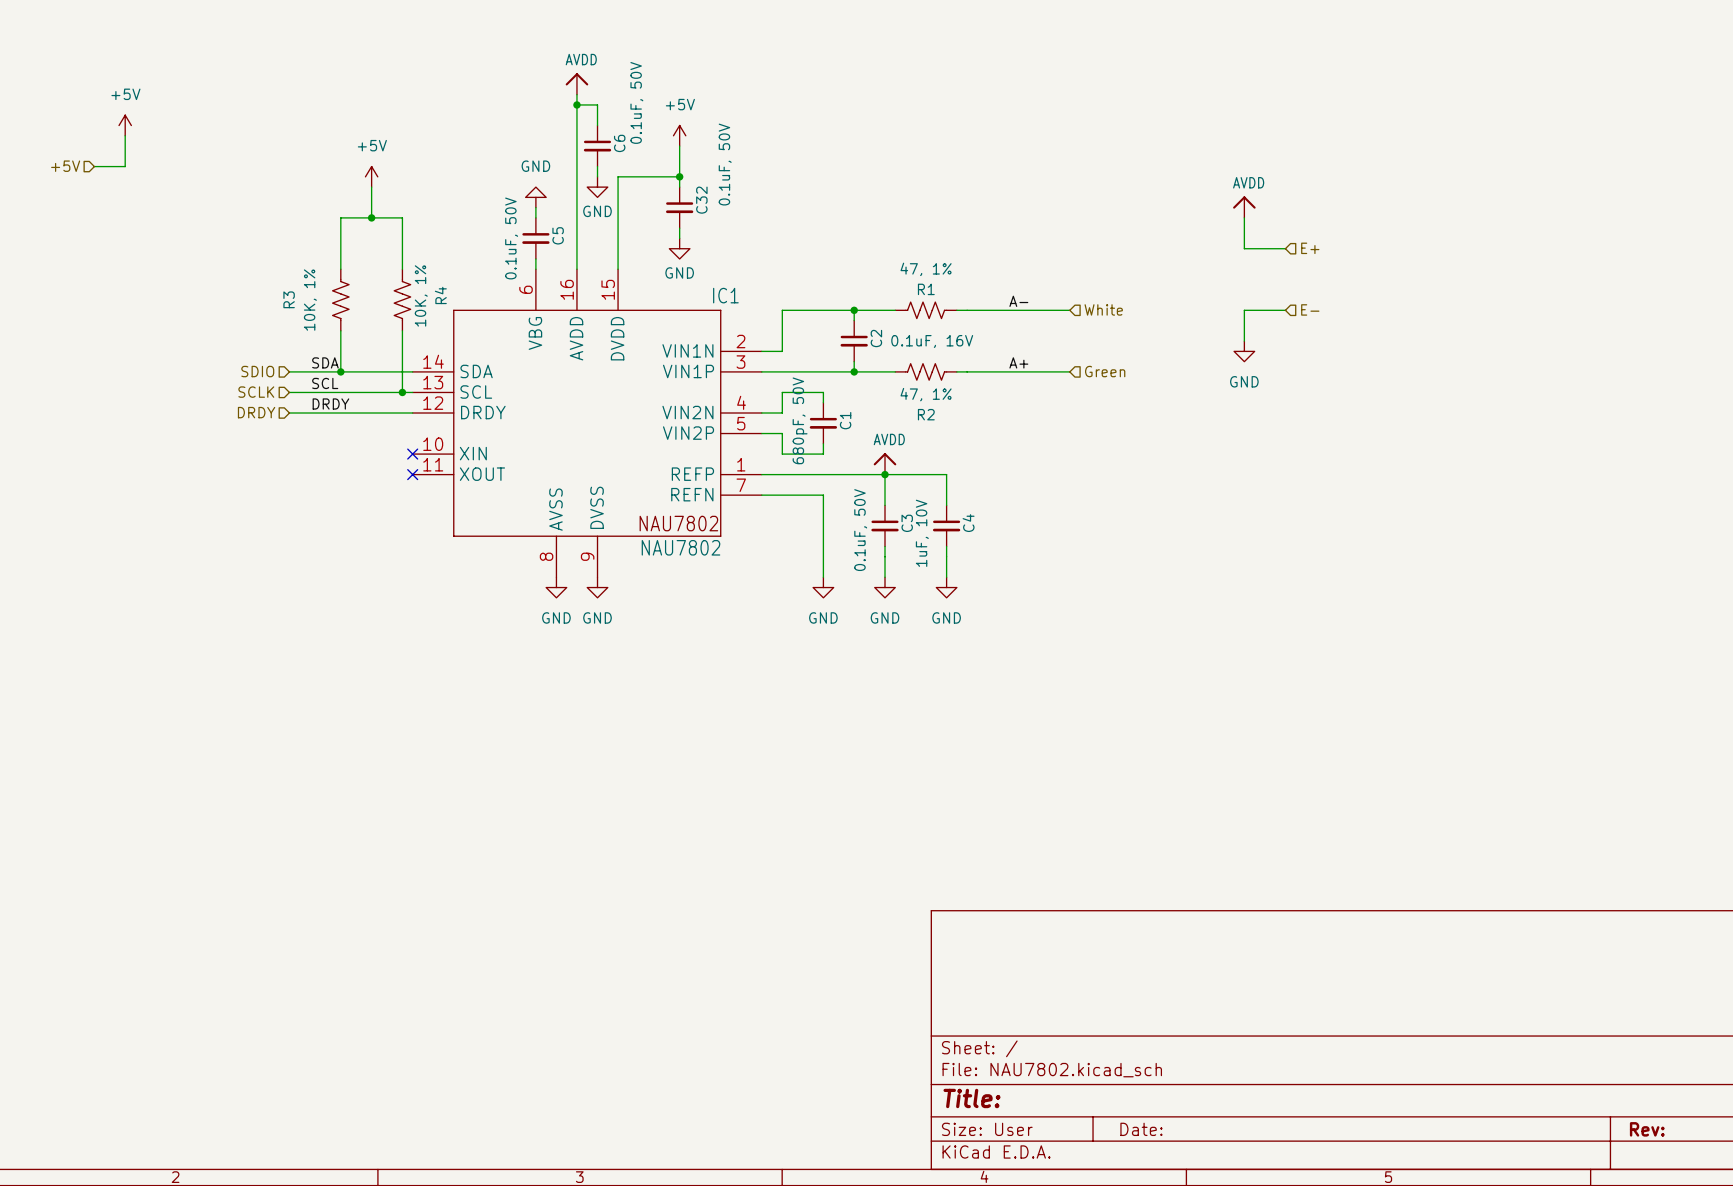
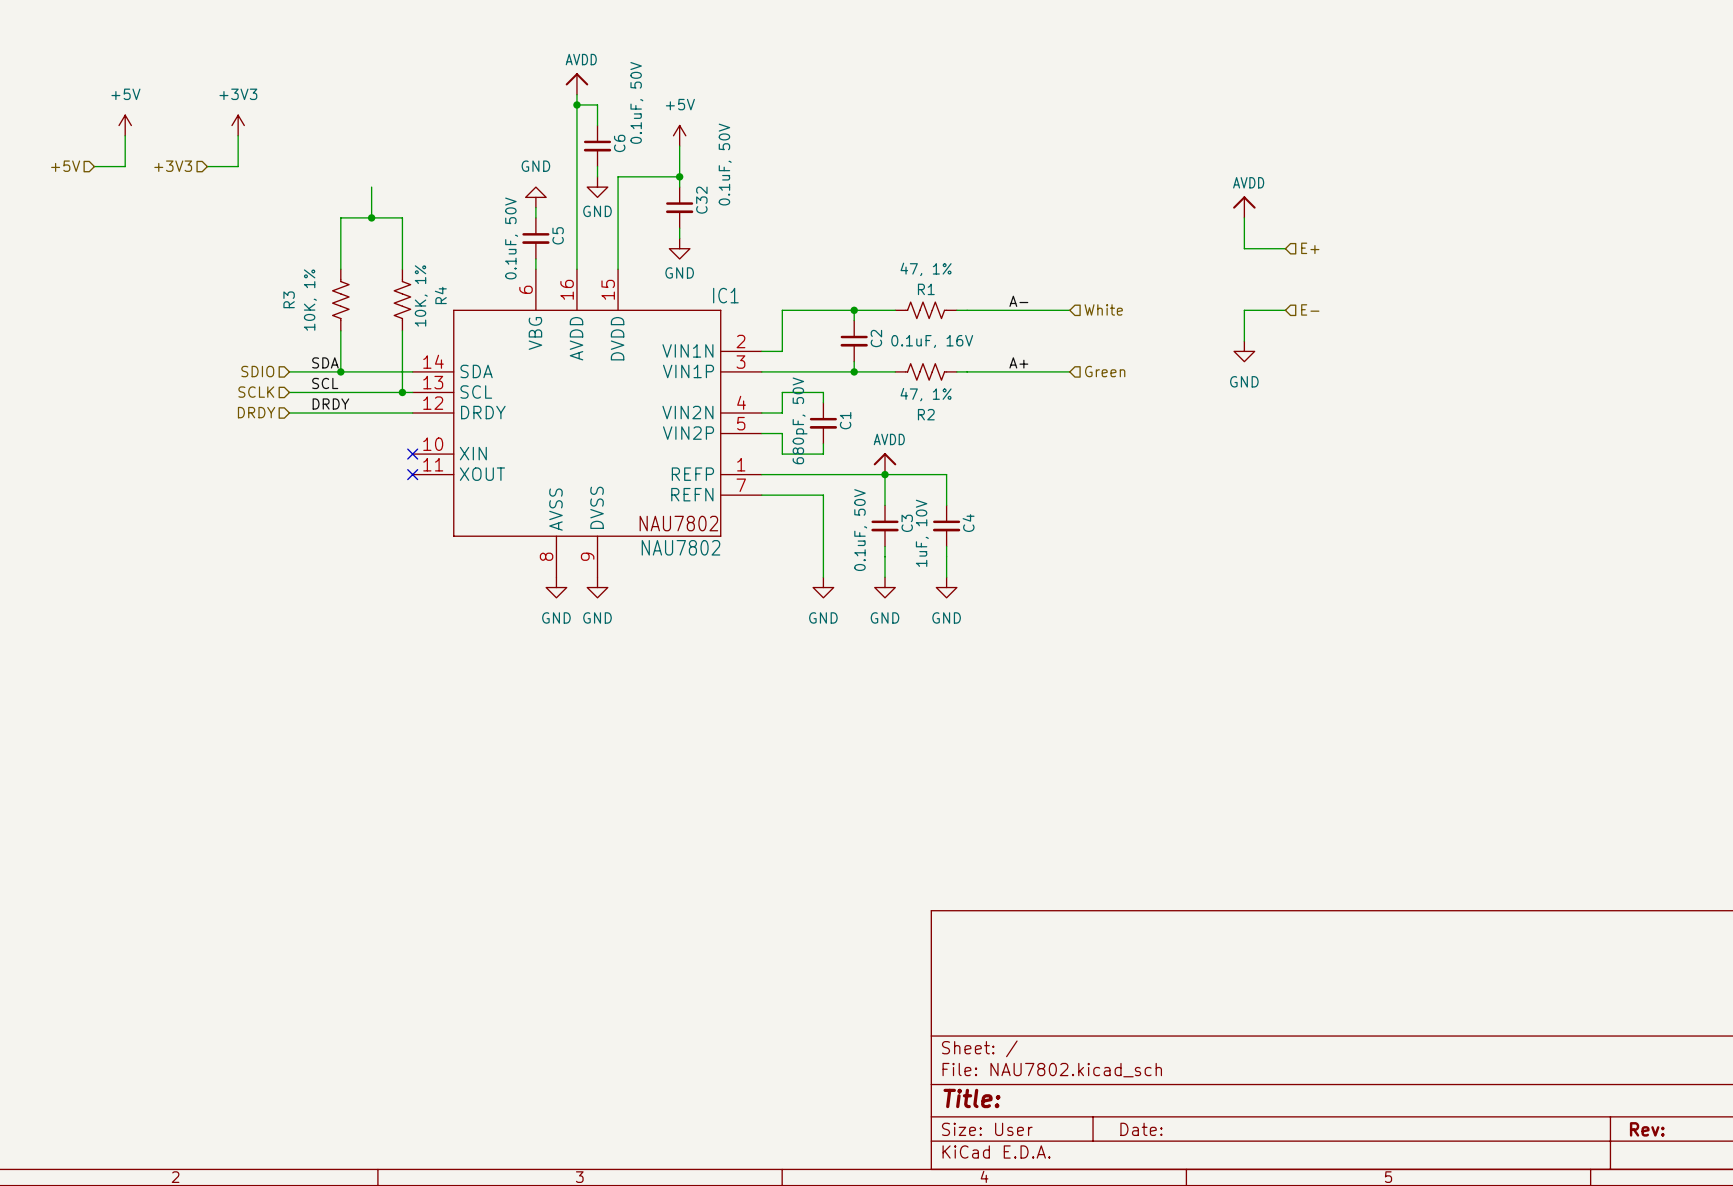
power symbol: none -> +3V3 (238, 125)
wire: none -> (238, 135) (238, 166) (207, 166)
hierarchical label: none -> +3V3 (173, 166)
power symbol: +5V (371, 176) -> none

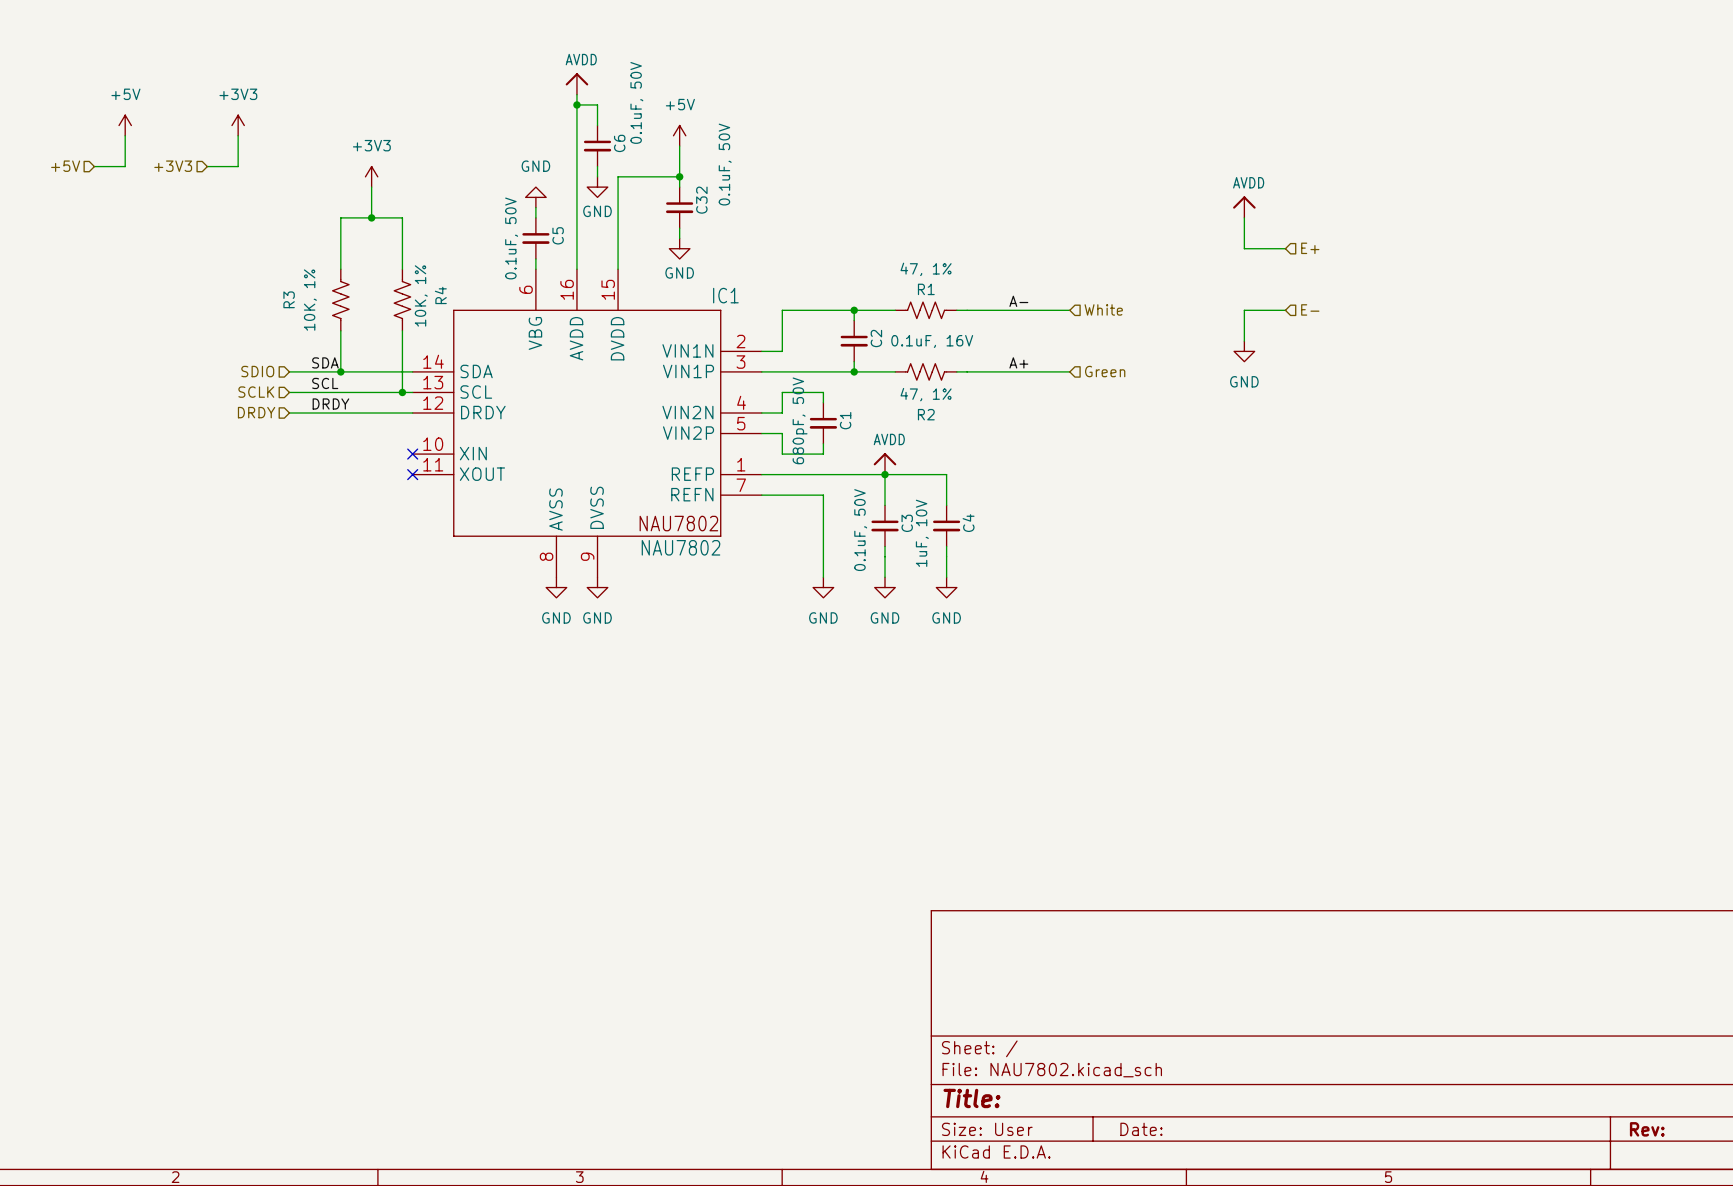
power symbol: none -> +3V3 (371, 176)

